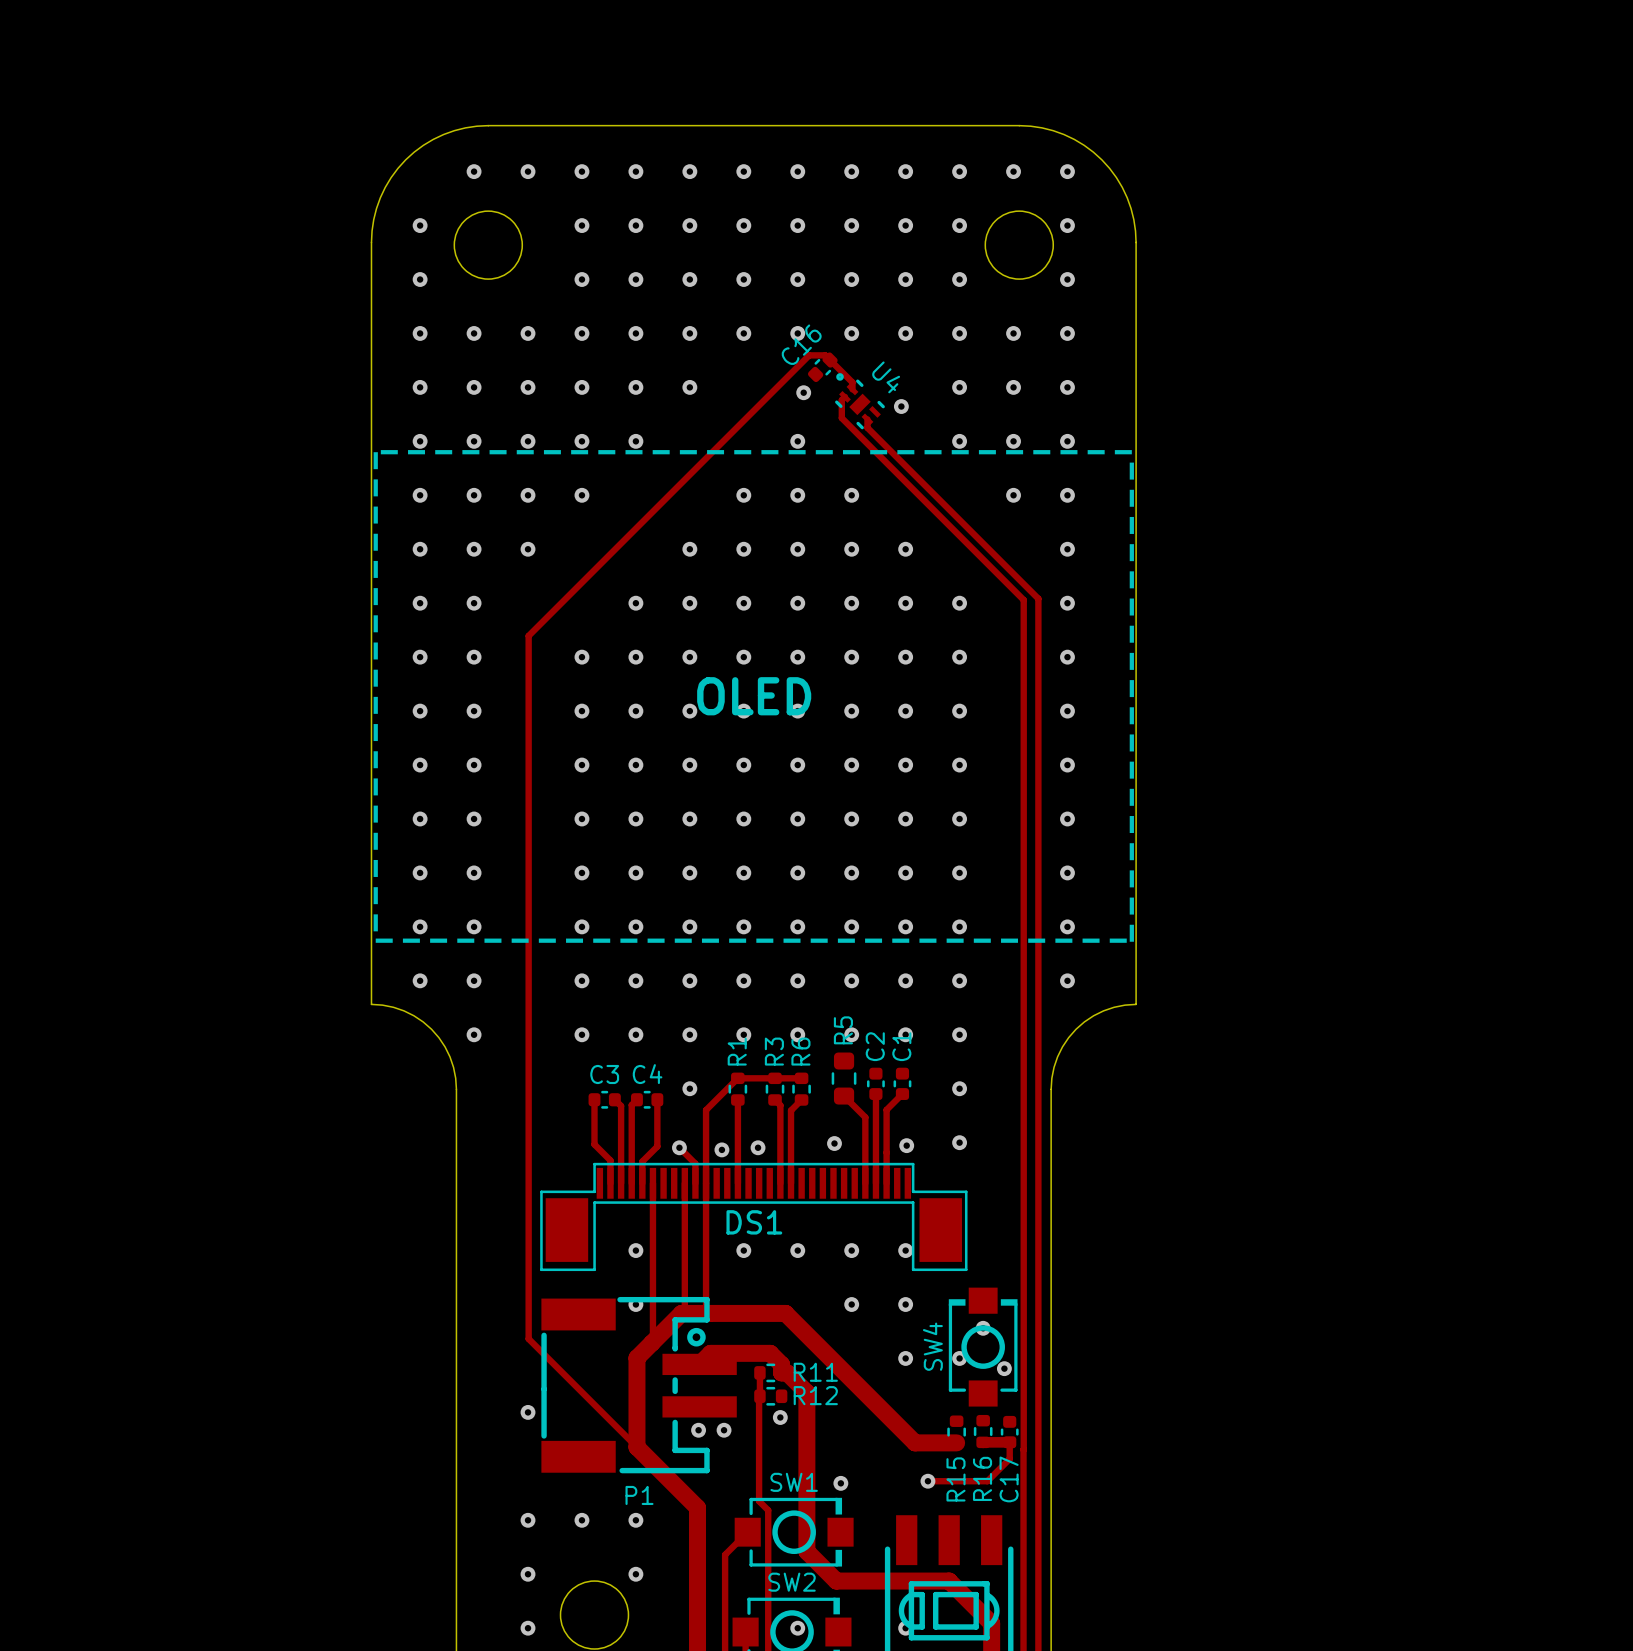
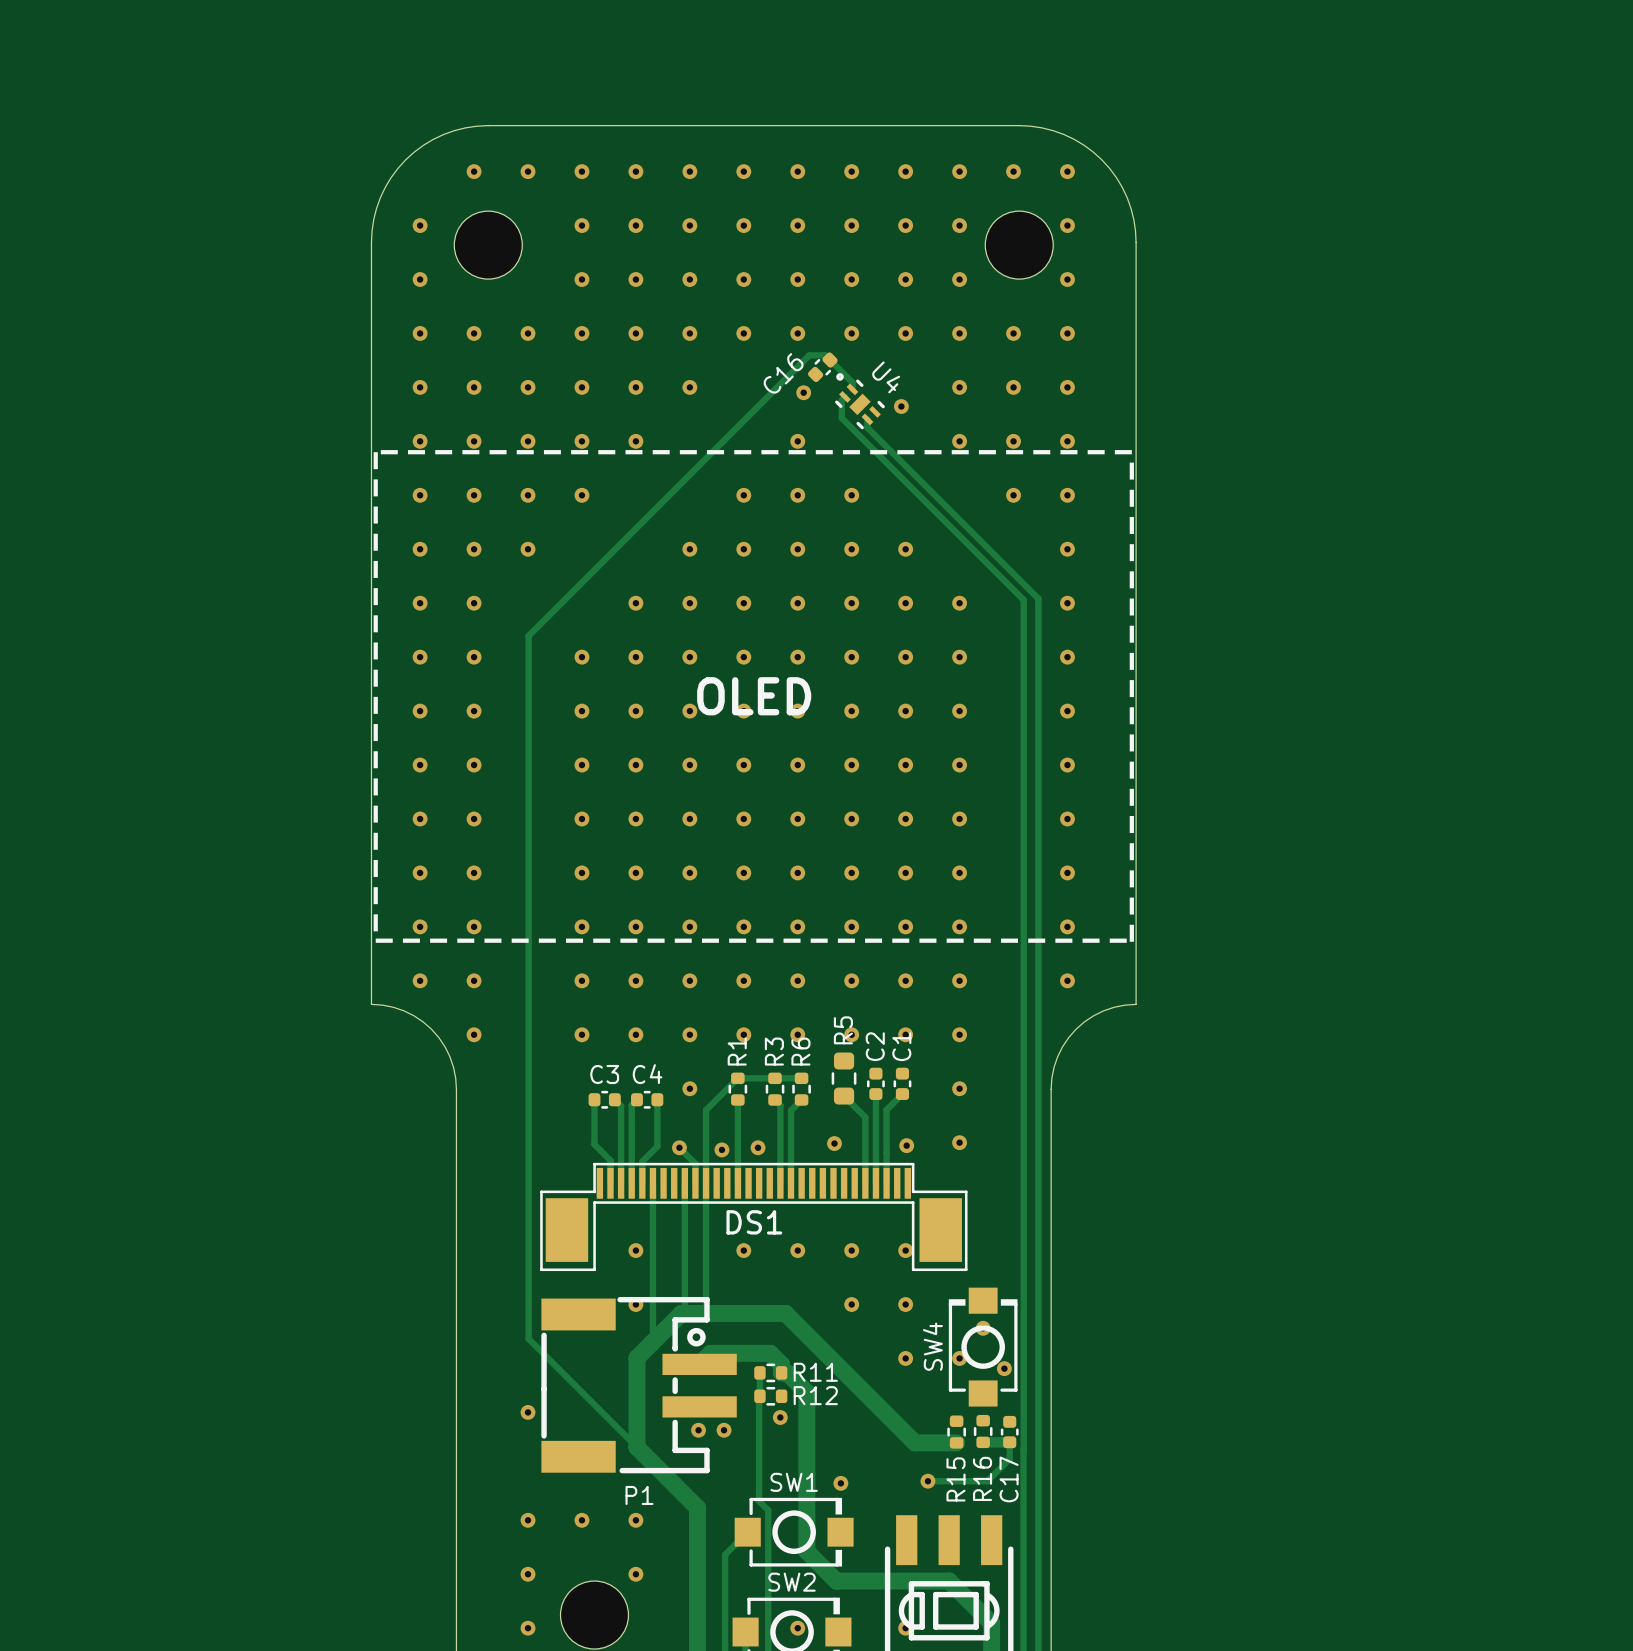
C16 name position: C16 (801, 344) -> C16 (783, 373)

